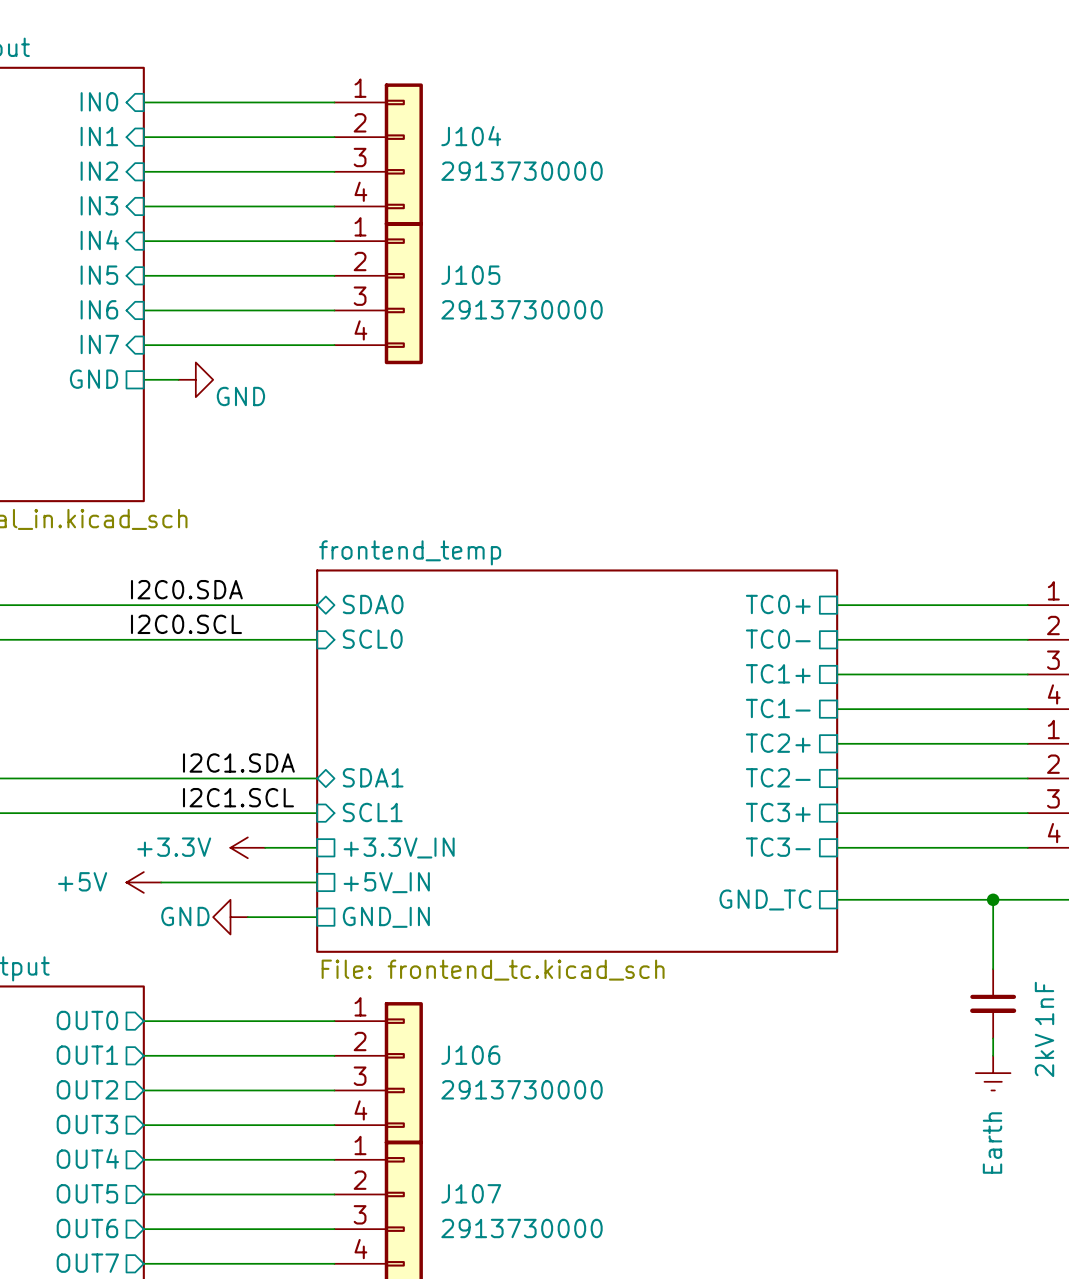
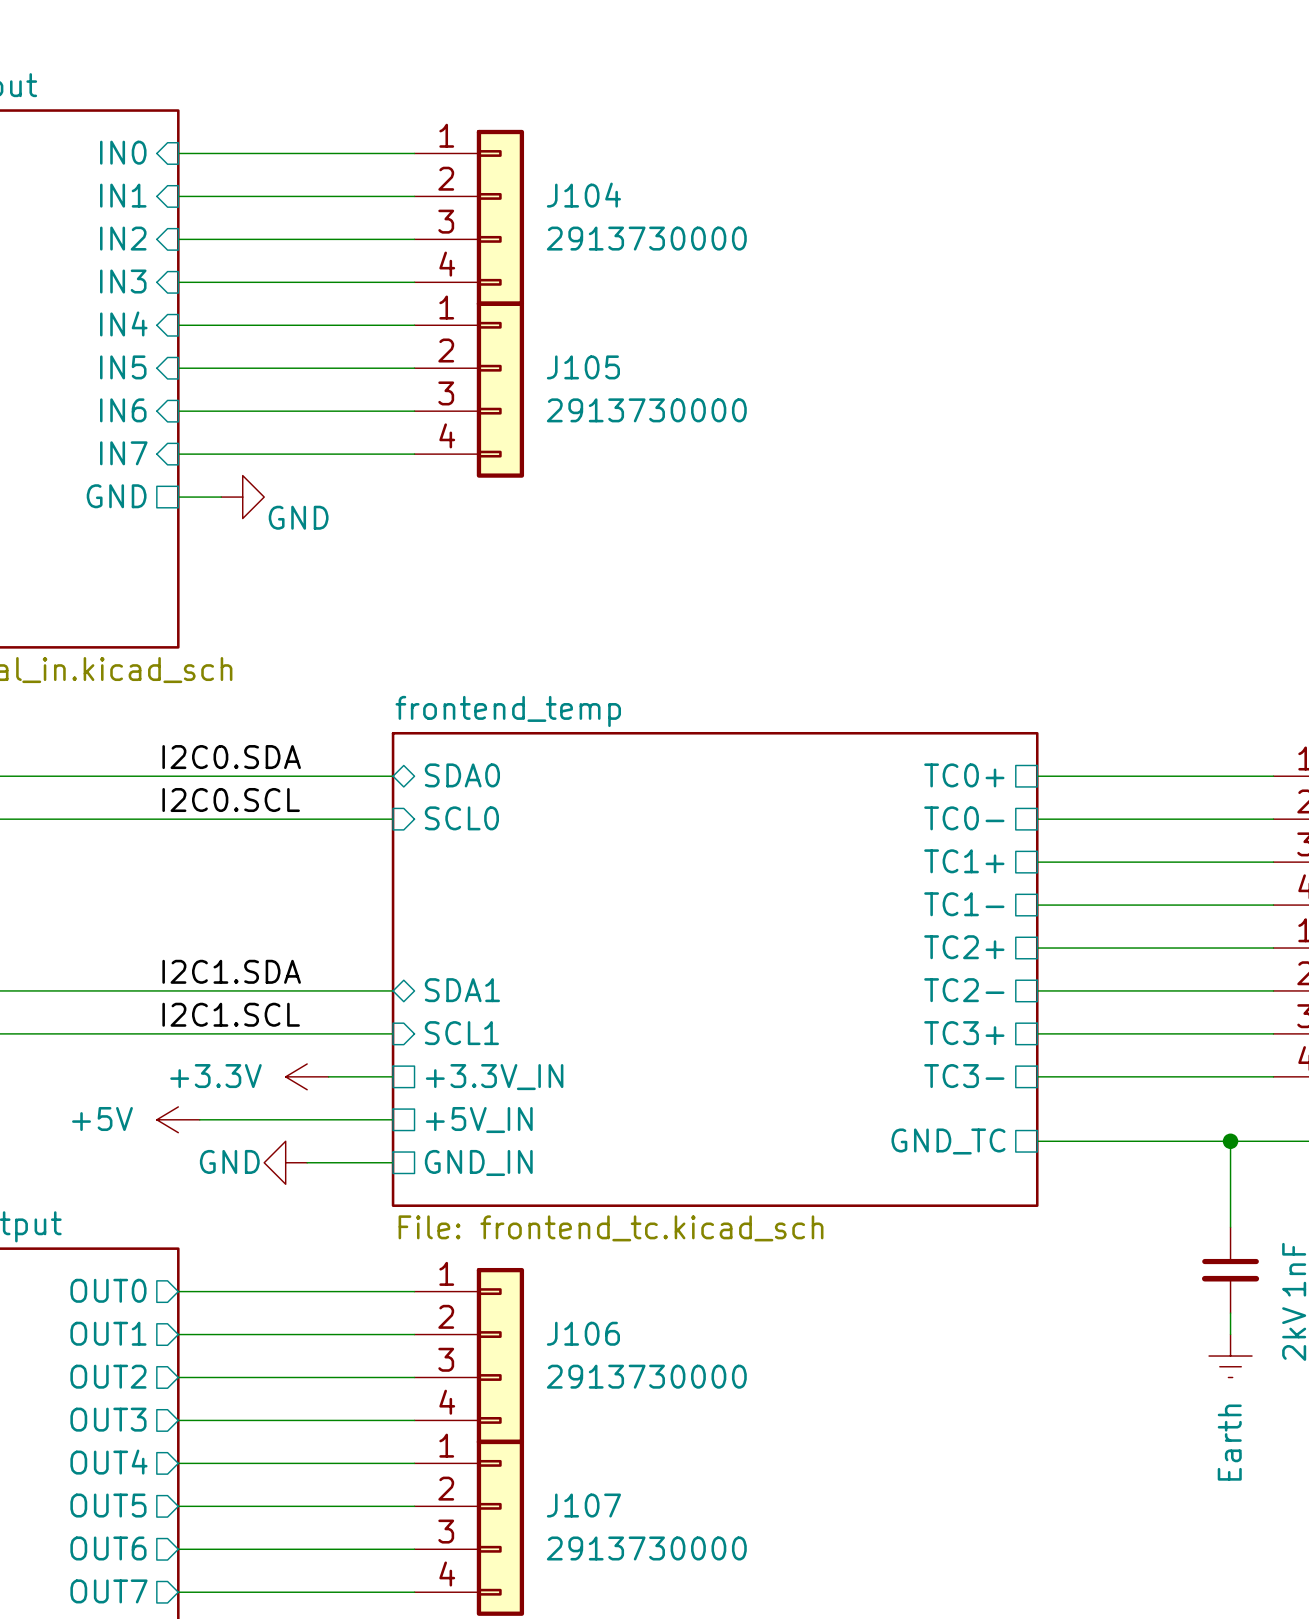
label position: I2C1.SDA (238, 763) -> I2C1.SDA (231, 971)
label position: I2C1.SCL (238, 797) -> I2C1.SCL (231, 1014)

